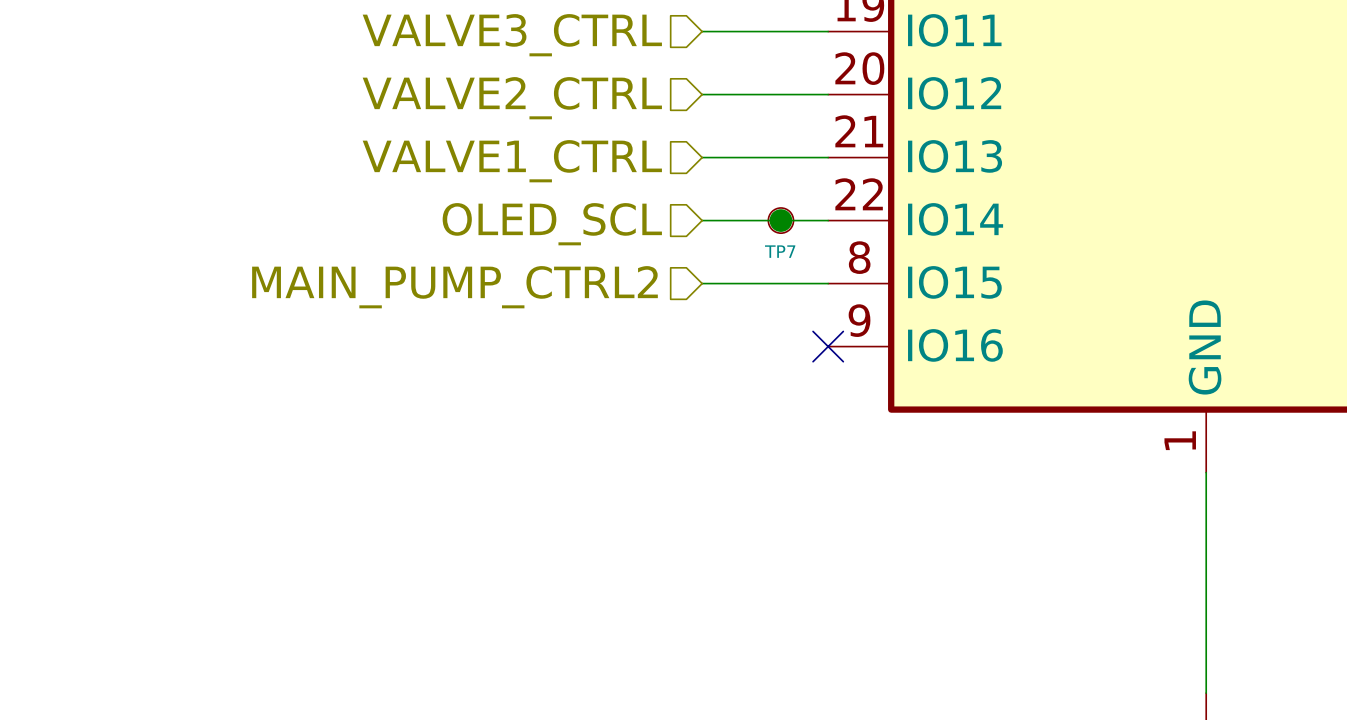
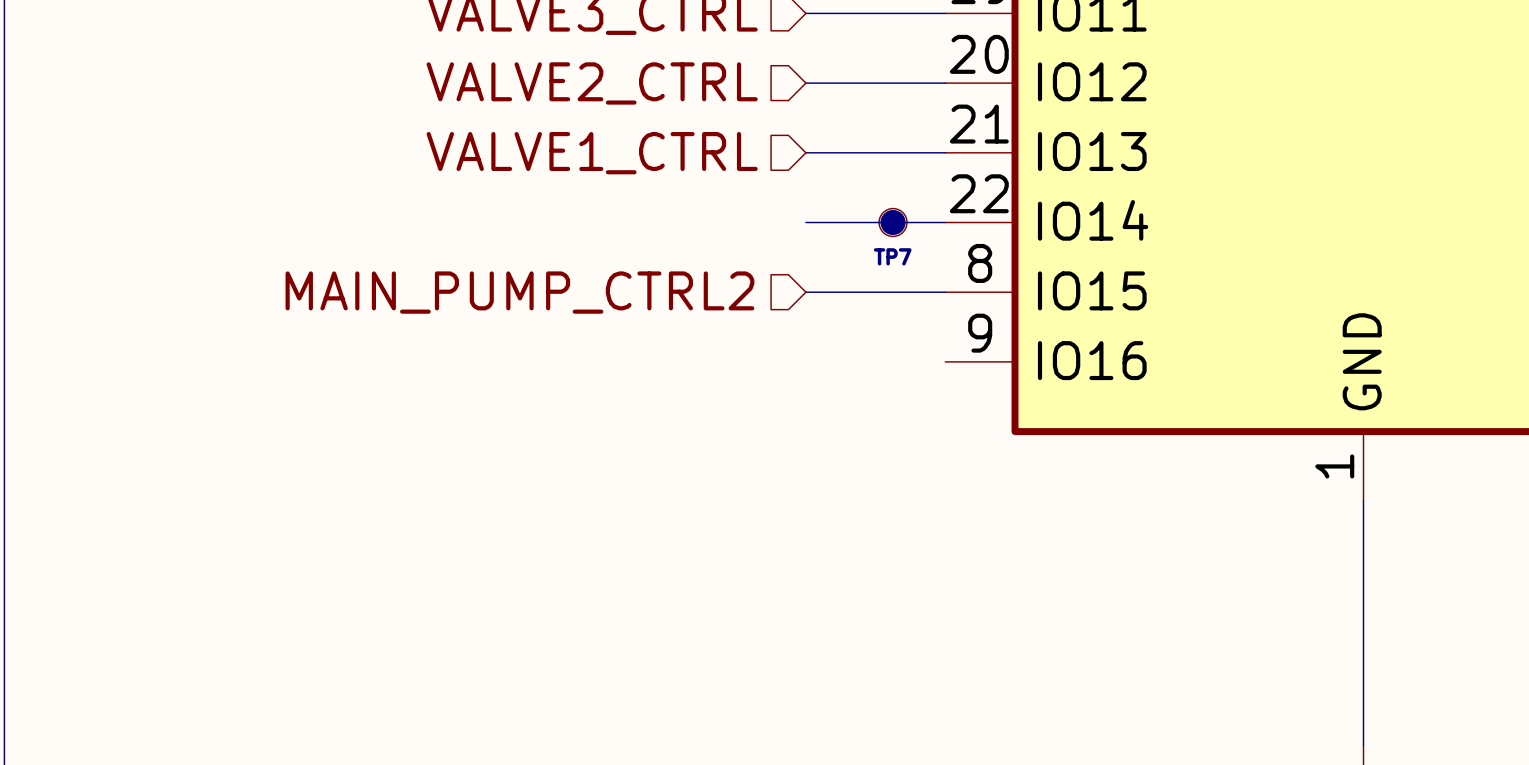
hierarchical label: OLED_SCL (552, 224) -> none
no-connect mark: (828, 346) -> none

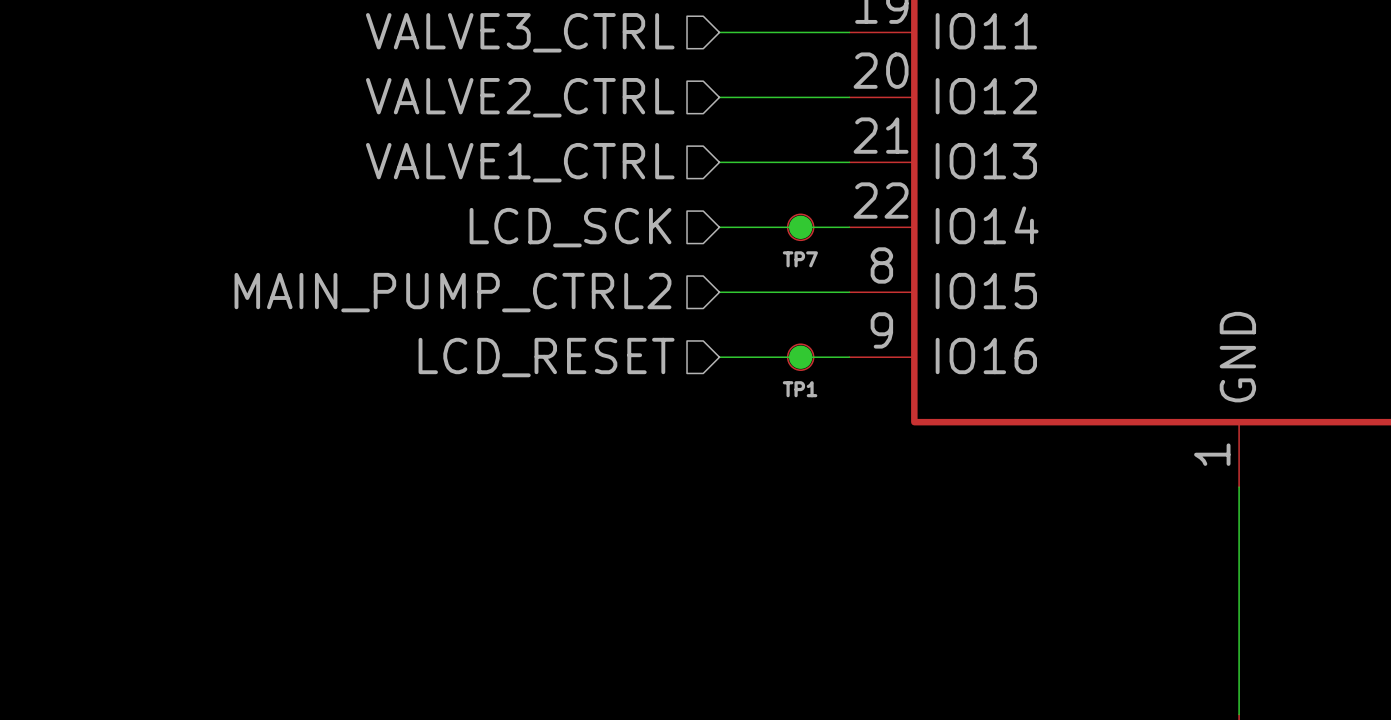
hierarchical label: none -> LCD_SCK (570, 227)
wire: none -> (719, 357) (849, 357)
junction: none -> (800, 357)
TP1: none -> (800, 357)
hierarchical label: none -> LCD_RESET (546, 357)

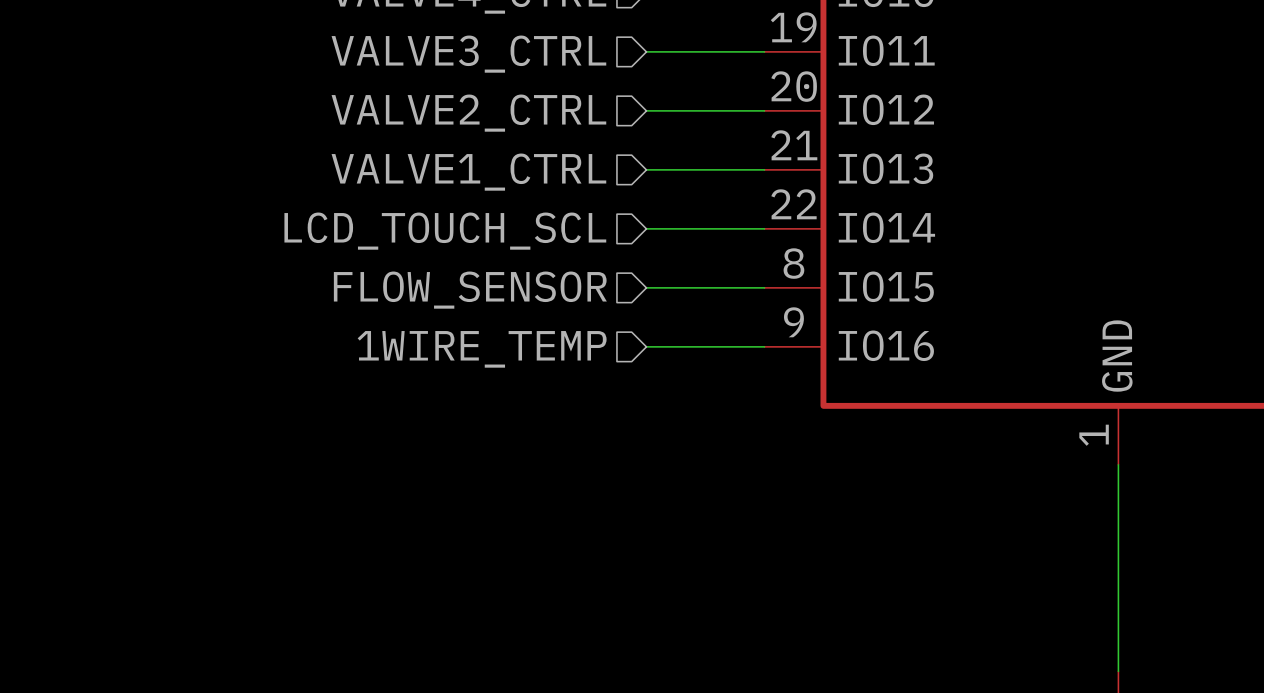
hierarchical label: LCD_SCK (570, 227) -> LCD_TOUCH_SCL (445, 231)
junction: (800, 227) -> none
TP7: (800, 227) -> none
hierarchical label: MAIN_PUMP_CTRL2 (452, 292) -> FLOW_SENSOR (470, 290)
hierarchical label: LCD_RESET (546, 357) -> 1WIRE_TEMP (482, 349)
junction: (800, 357) -> none
TP1: (800, 357) -> none

